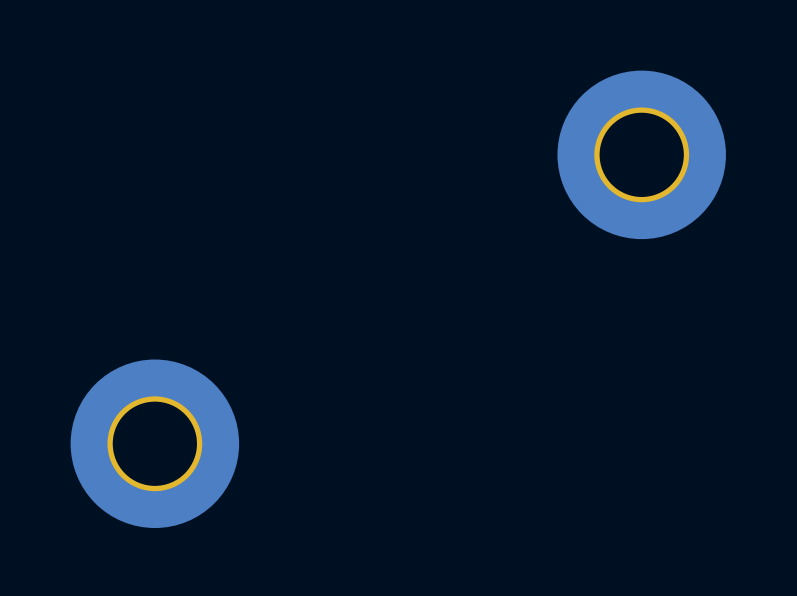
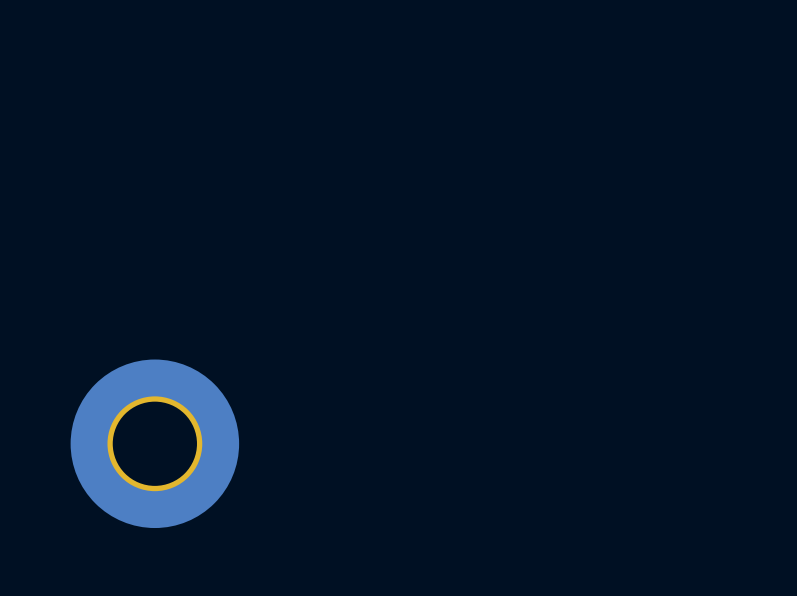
part: (641, 154) -> none

